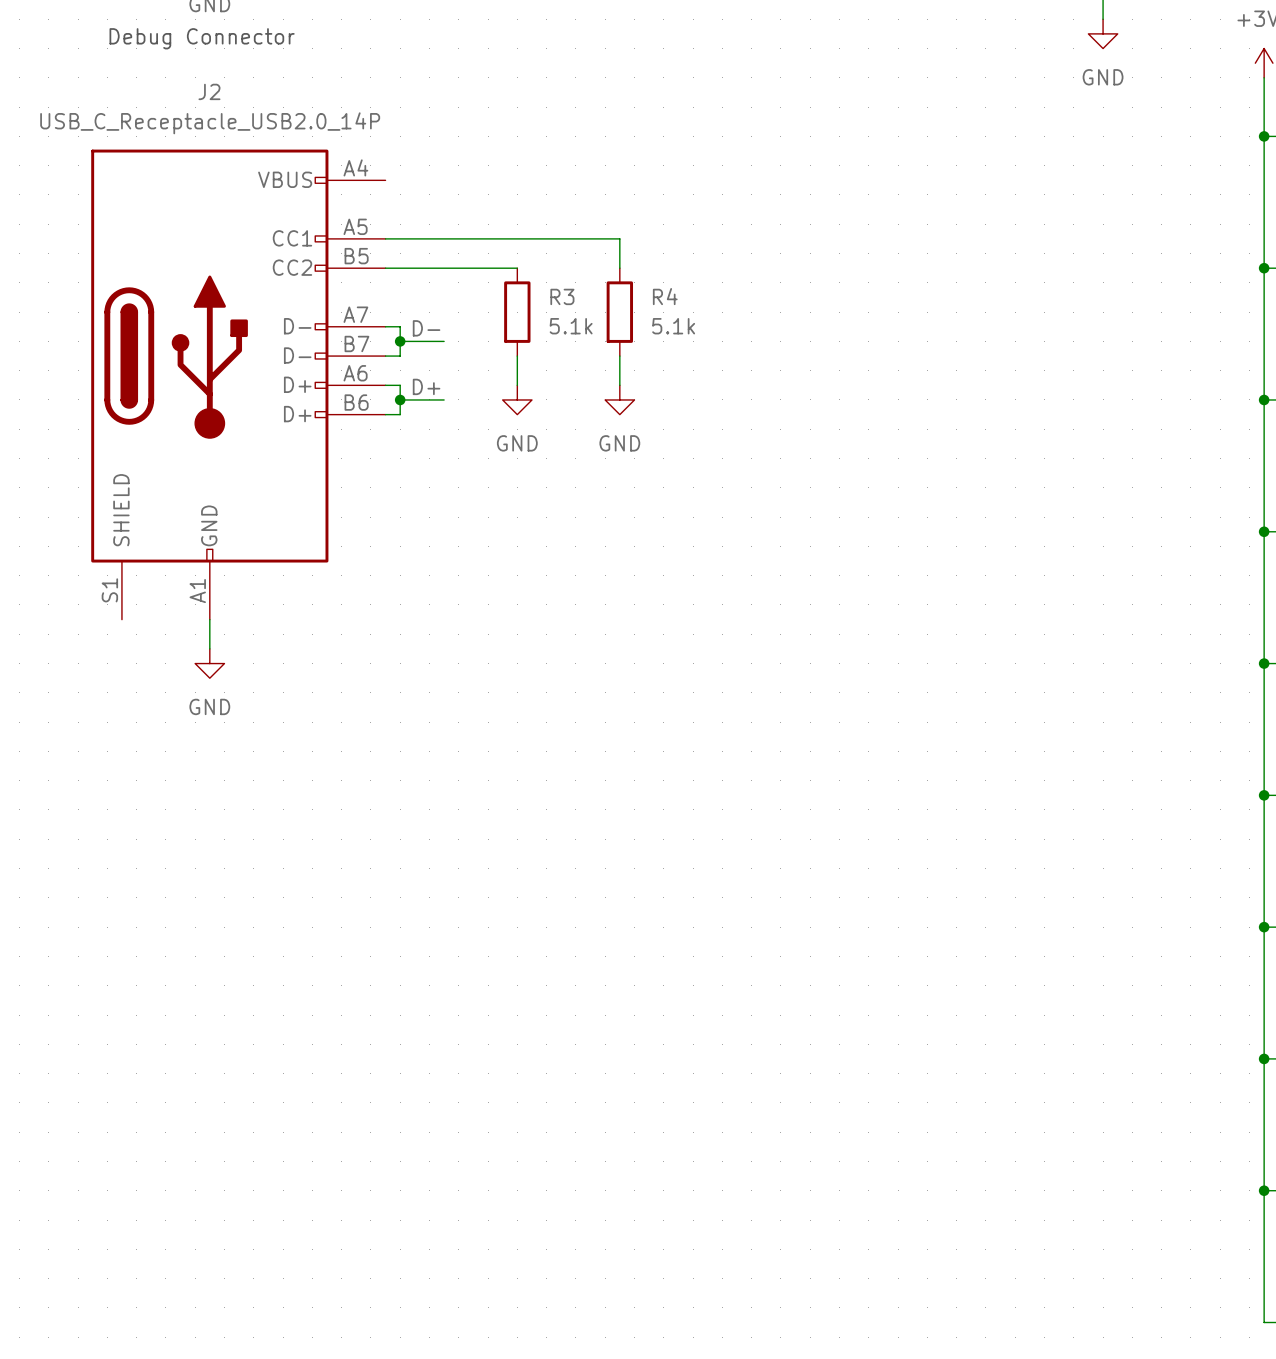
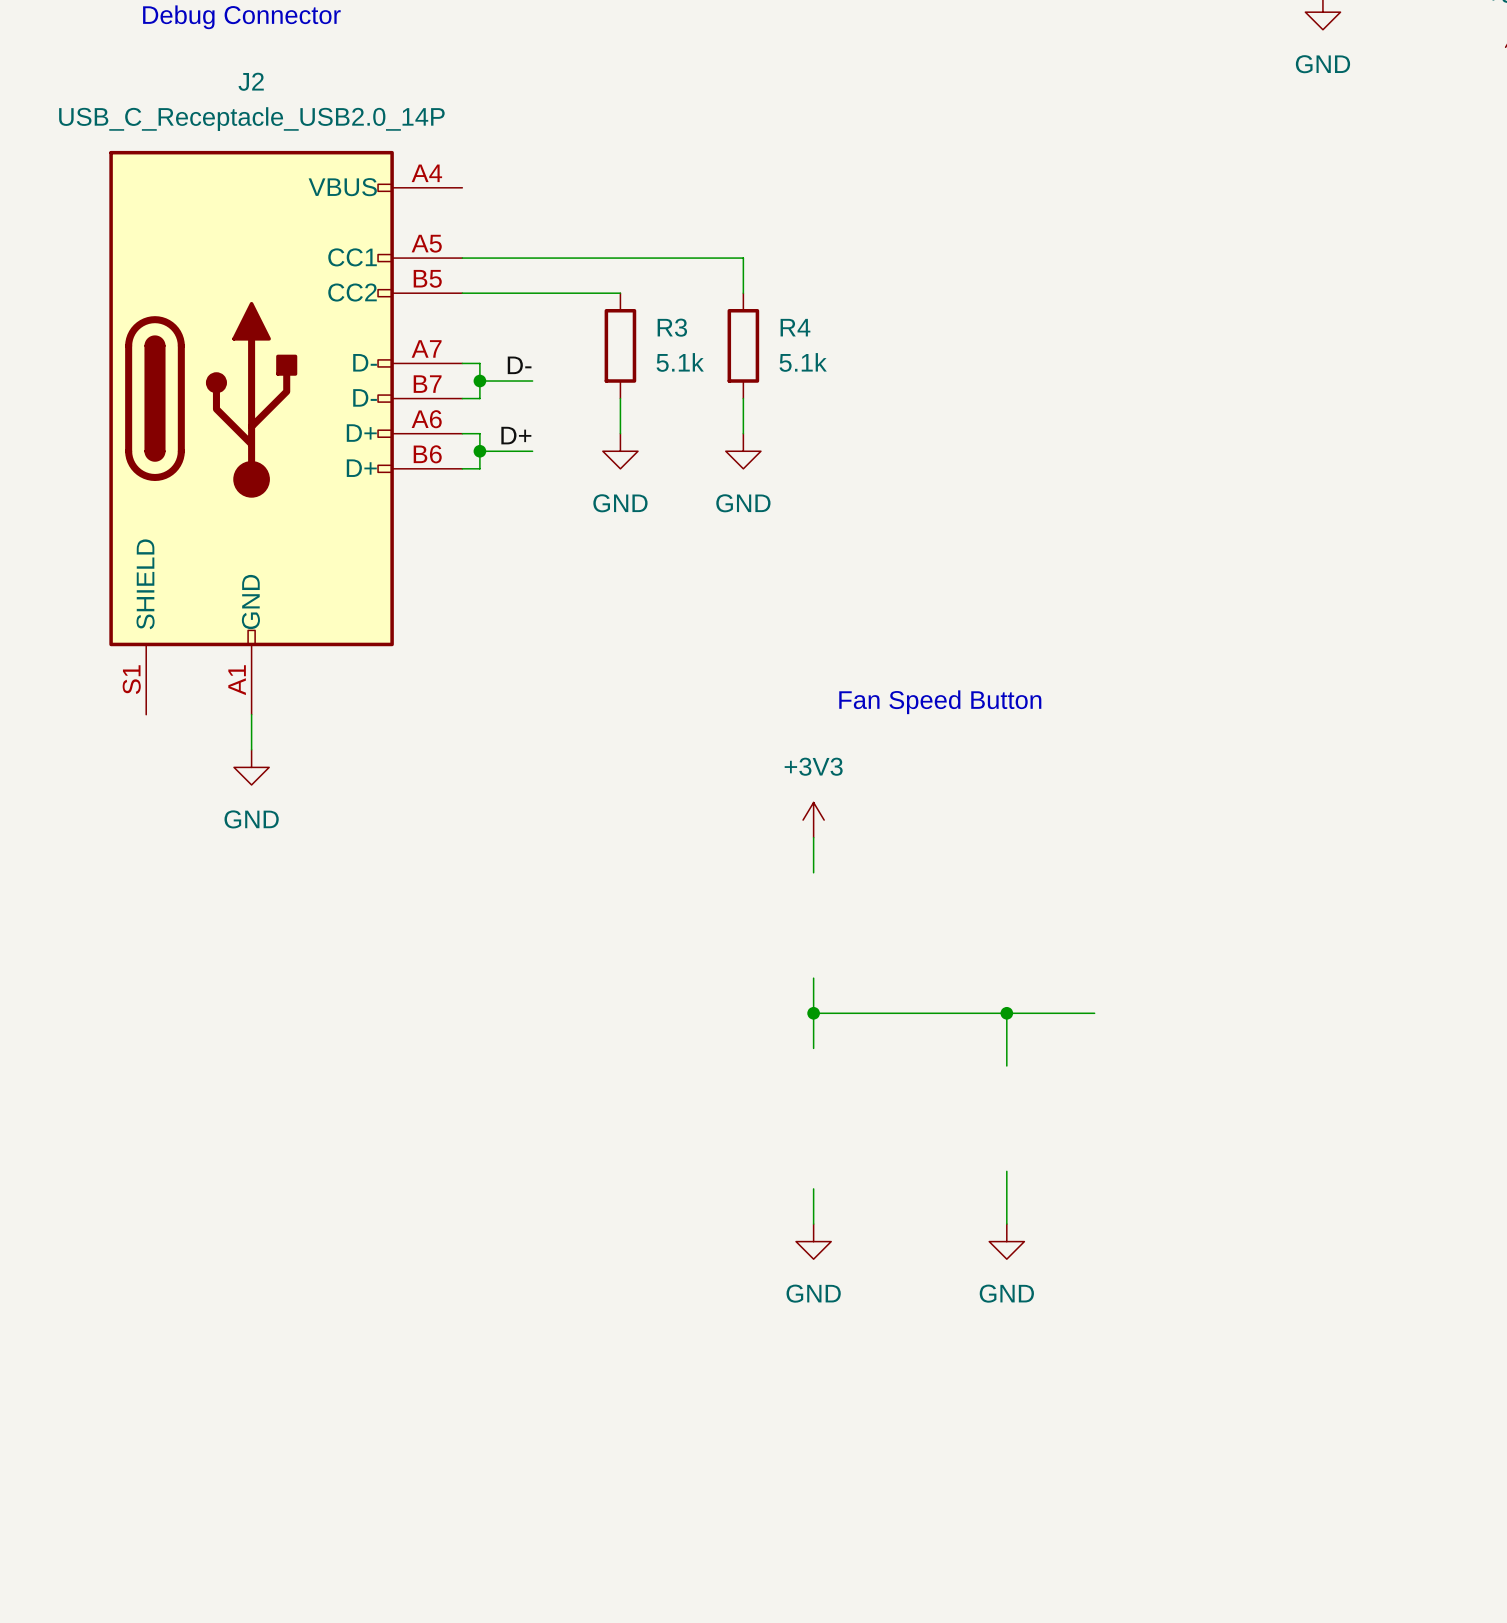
text: none -> Fan Speed Button (940, 702)
power symbol: none -> +3V3 (813, 820)
wire: none -> (813, 837) (813, 872)
wire: none -> (813, 978) (813, 1048)
wire: none -> (813, 1013) (1094, 1013)
junction: none -> (813, 1013)
wire: none -> (1006, 1013) (1006, 1065)
junction: none -> (1006, 1013)
wire: none -> (1006, 1171) (1006, 1224)
wire: none -> (813, 1188) (813, 1224)
power symbol: none -> GND (813, 1241)
power symbol: none -> GND (1006, 1241)

